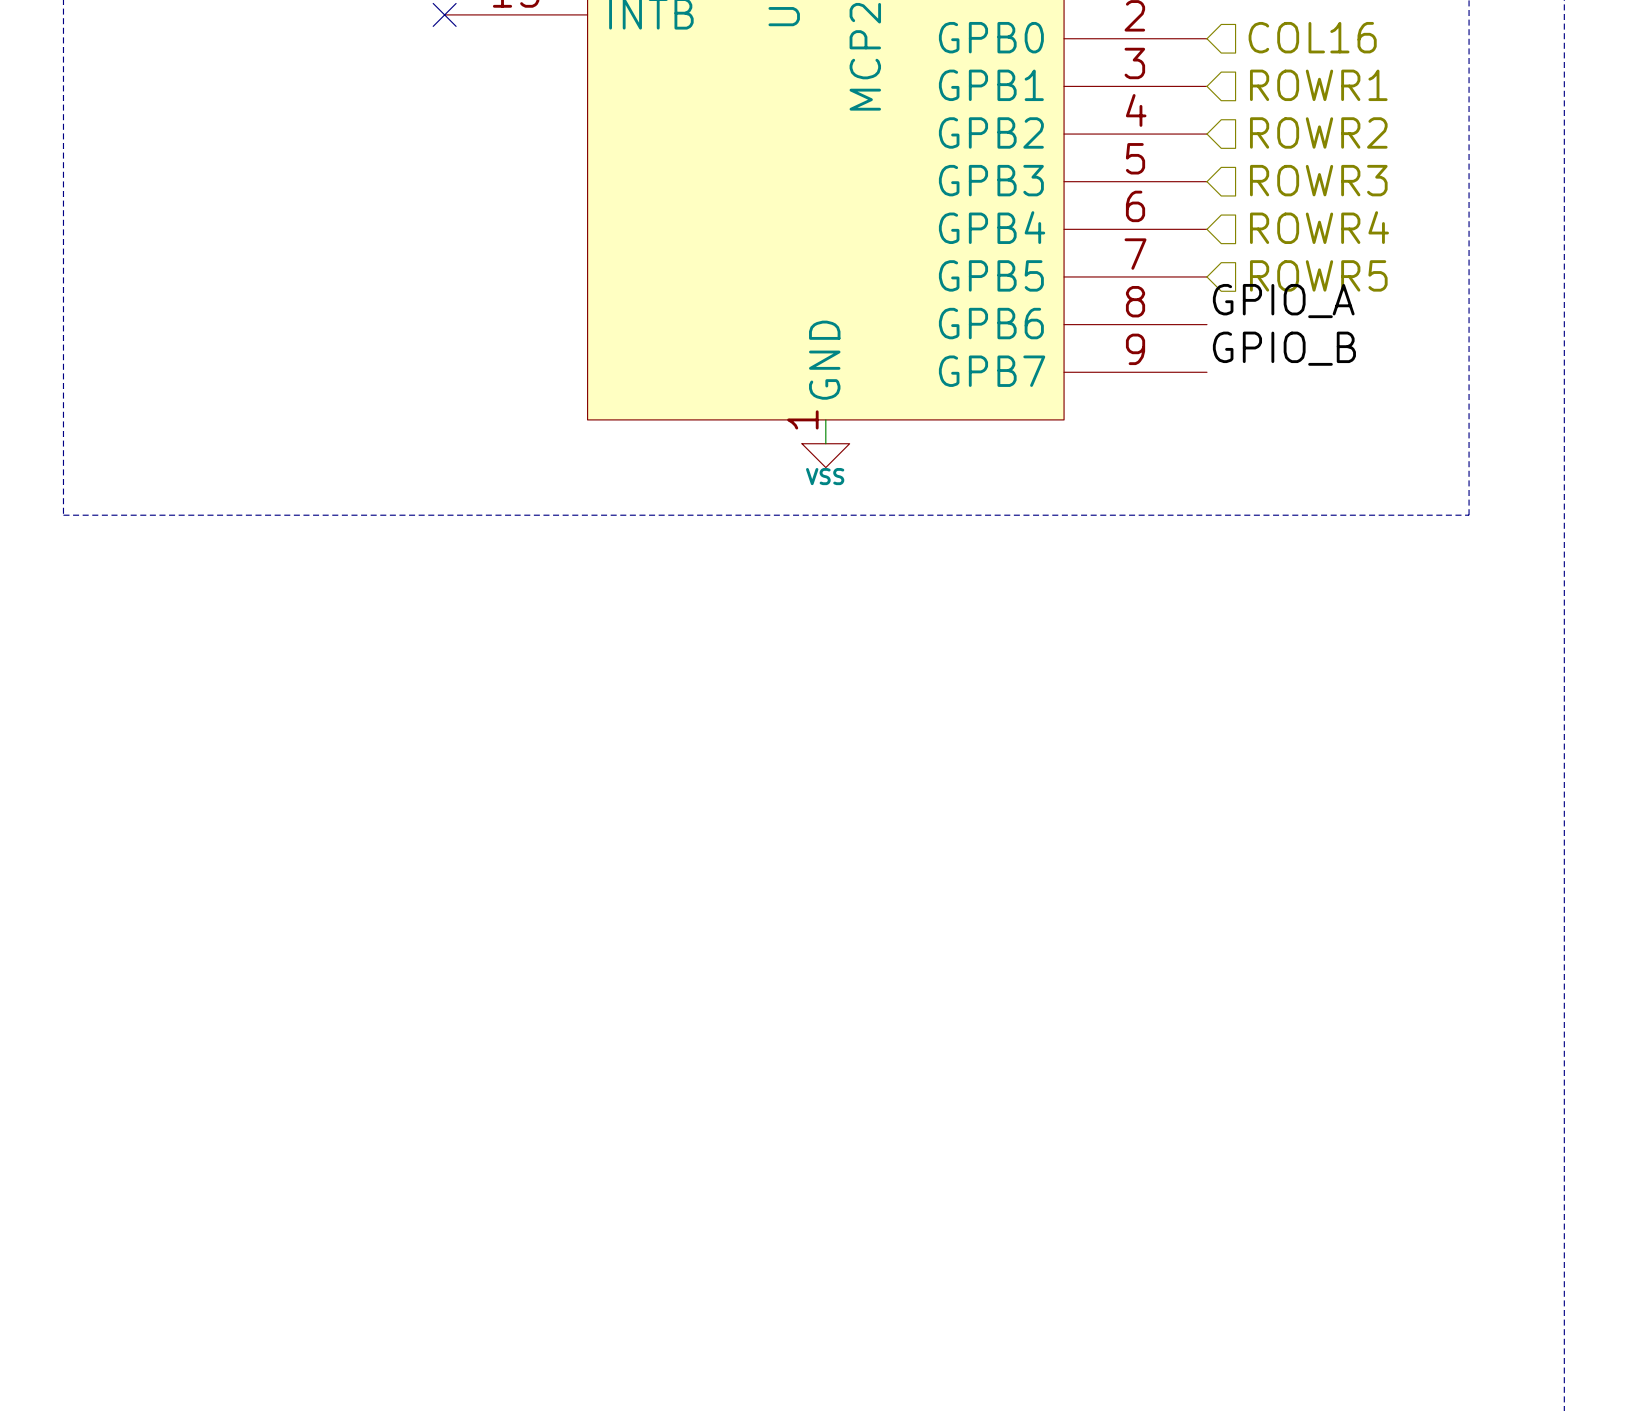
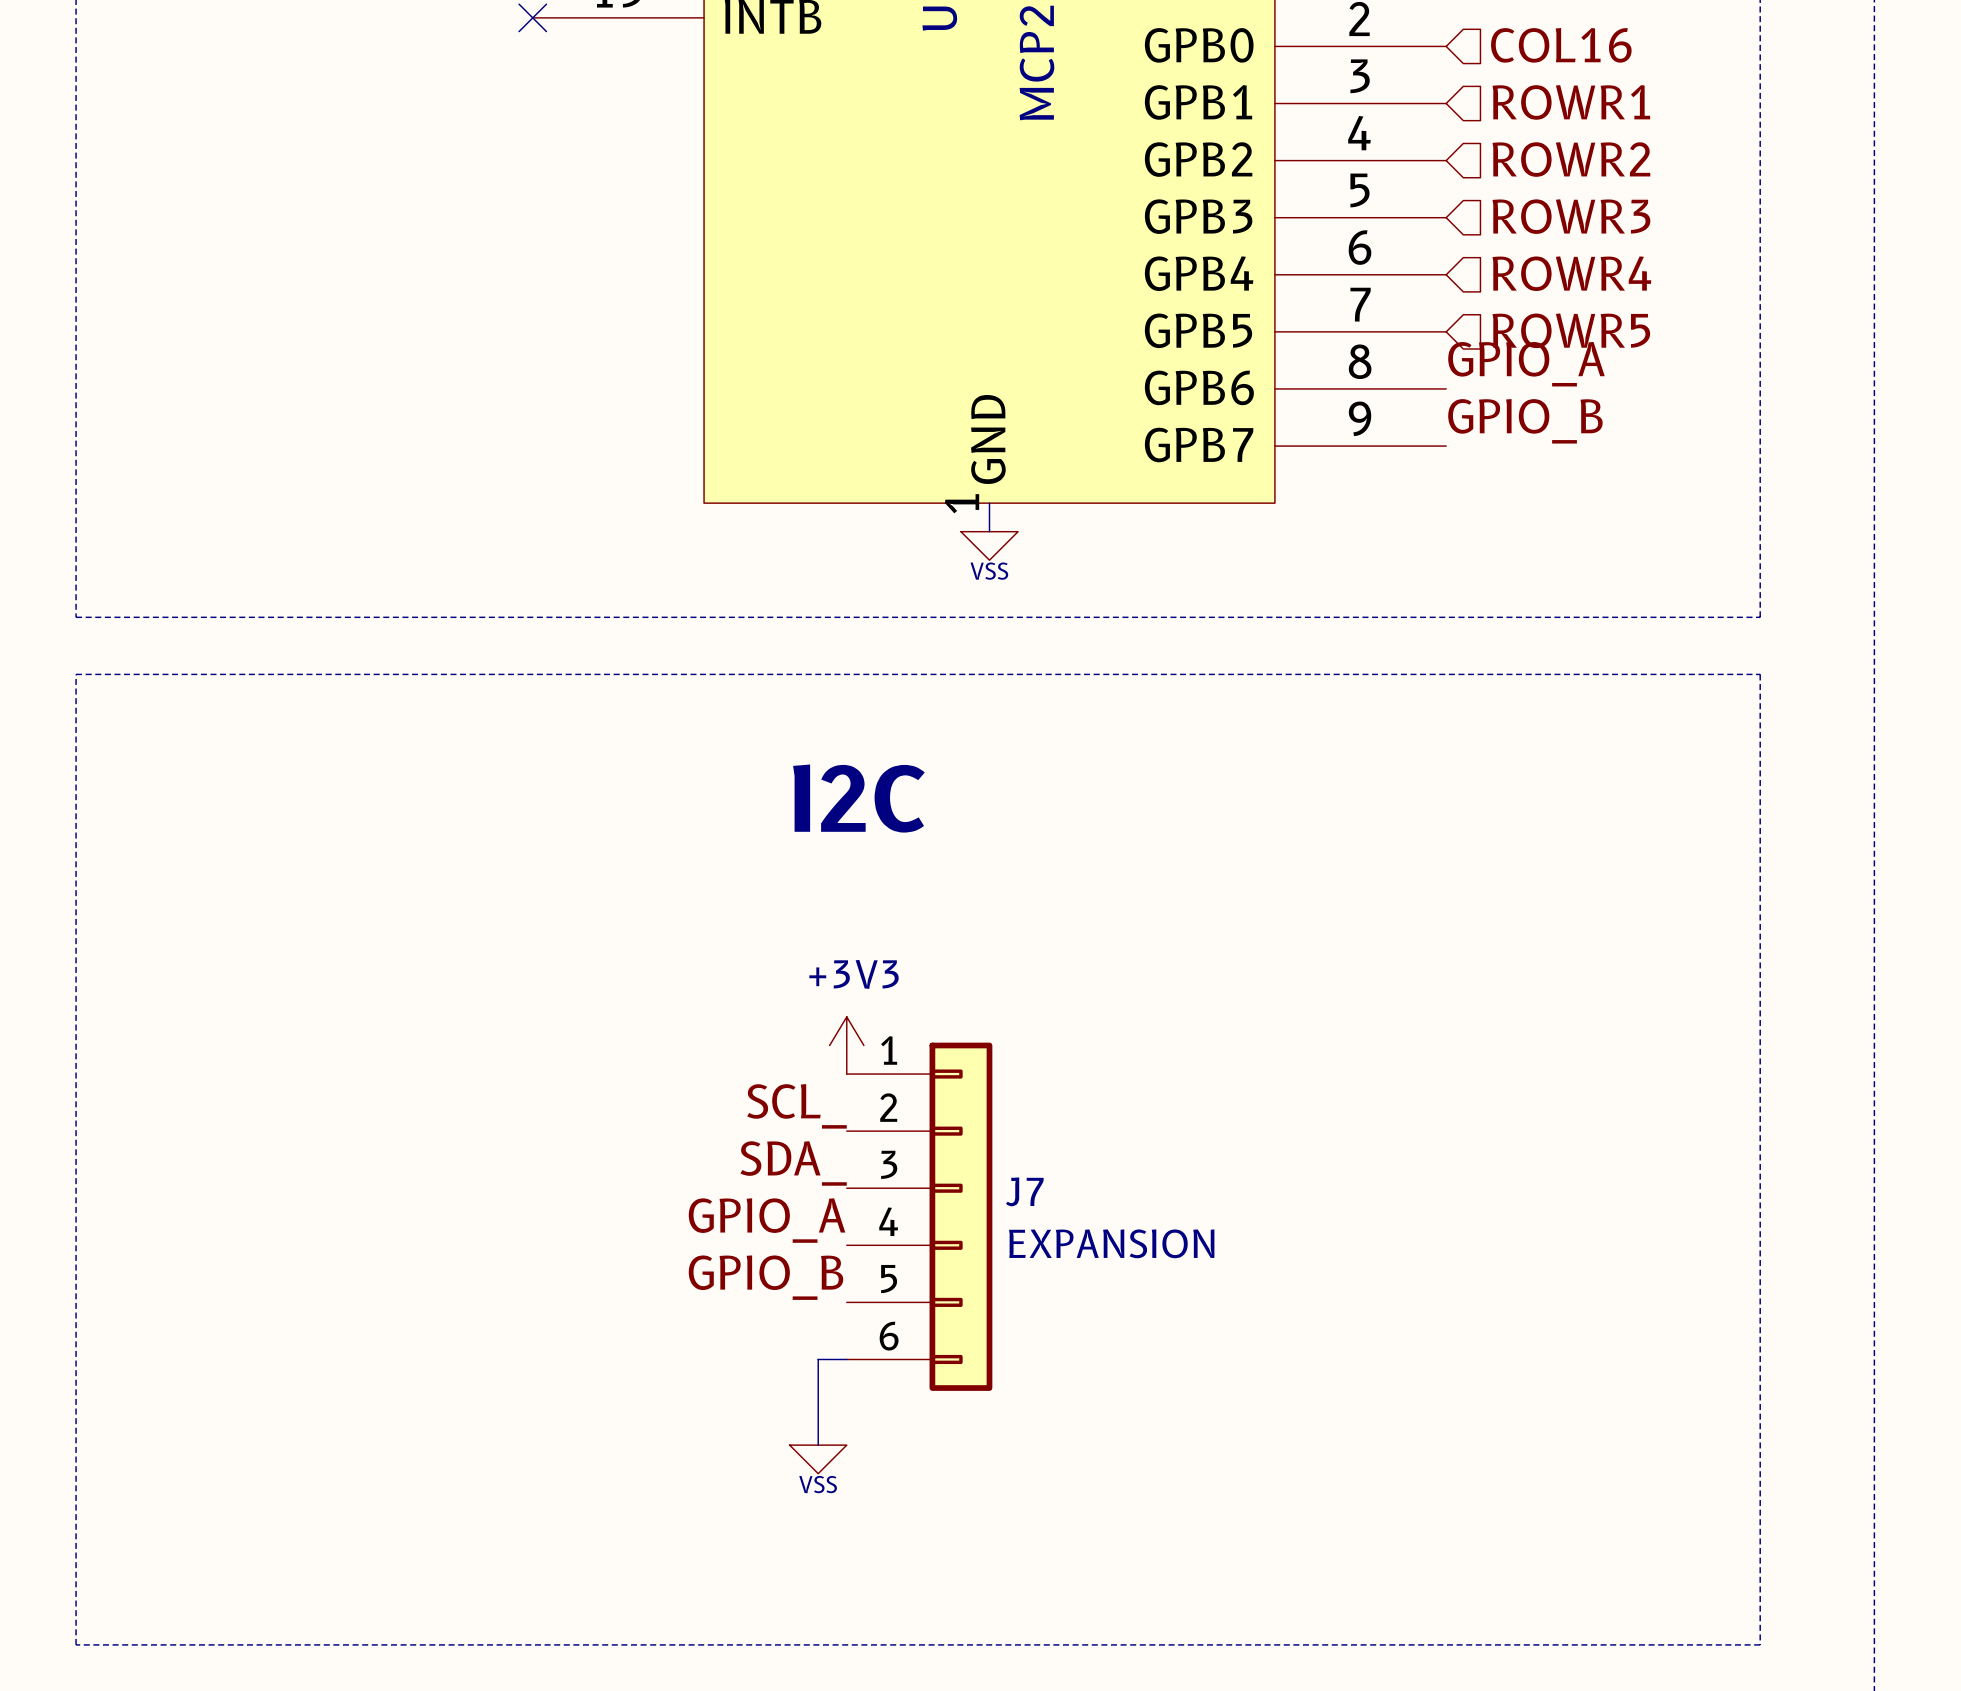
line: none -> (76, 674) (1760, 674) (1760, 1644) (76, 1644) (76, 674)
text: none -> I2C (858, 798)
power symbol: none -> +3V3 (846, 1045)
label: none -> SCL_ (796, 1106)
label: none -> SDA_ (793, 1163)
label: none -> GPIO_A (767, 1220)
J7: none -> EXPANSION (919, 1216)
label: none -> GPIO_B (765, 1277)
wire: none -> (846, 1359) (818, 1359) (818, 1445)
power symbol: none -> VSS (818, 1459)

